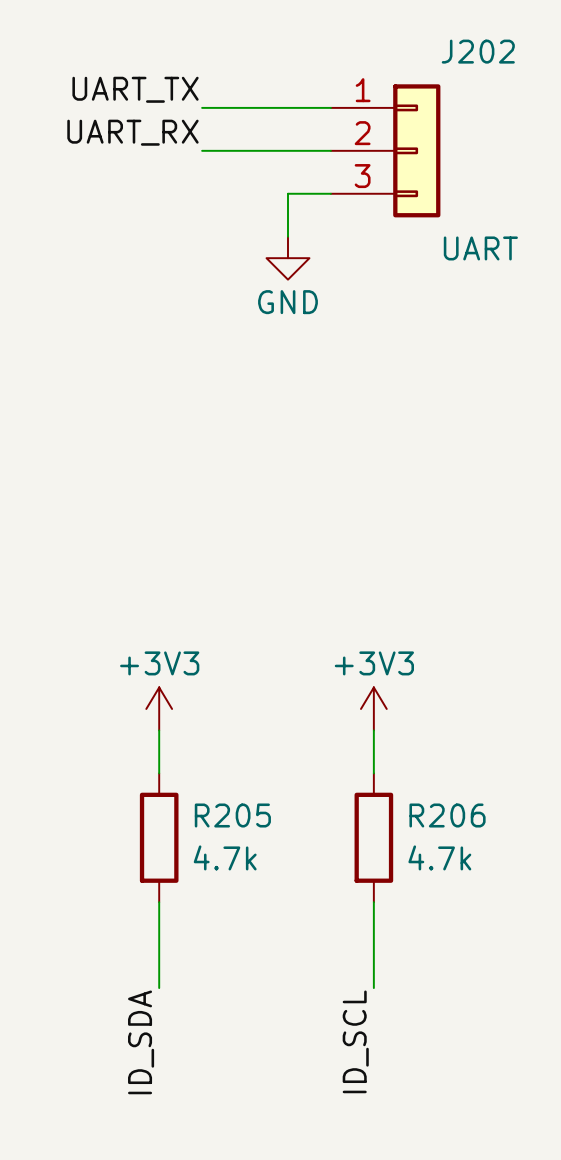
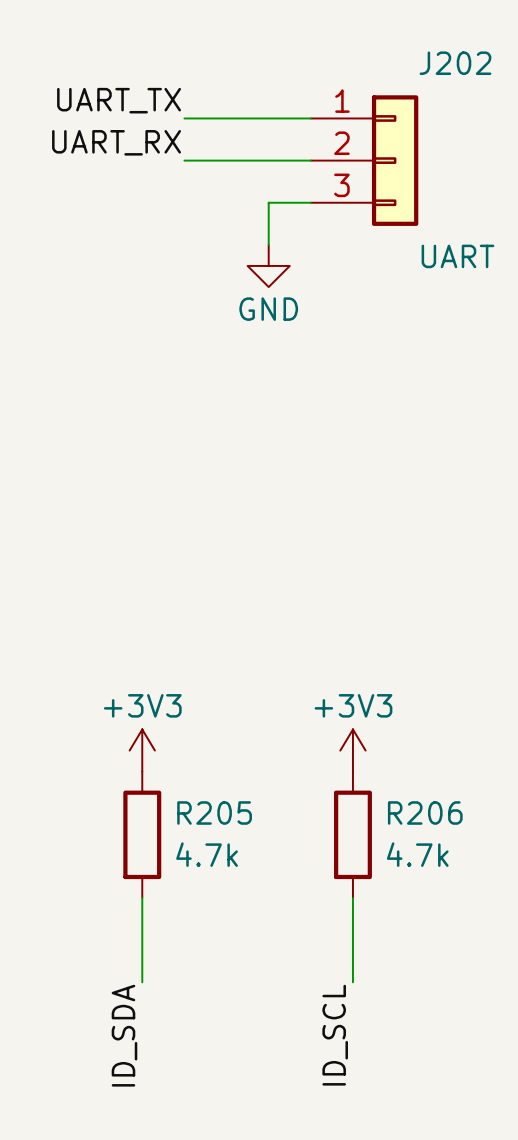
power symbol position: +3V3 (159, 708) -> +3V3 (142, 750)
power symbol position: +3V3 (373, 708) -> +3V3 (352, 750)

